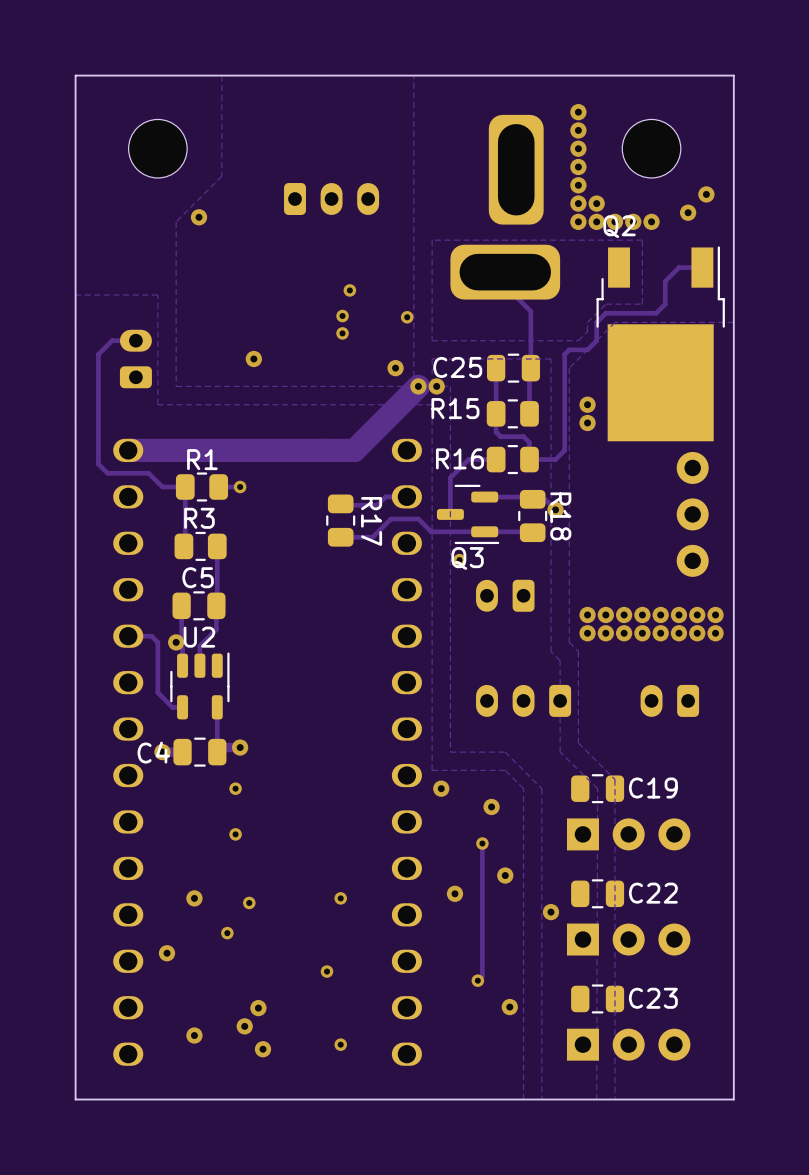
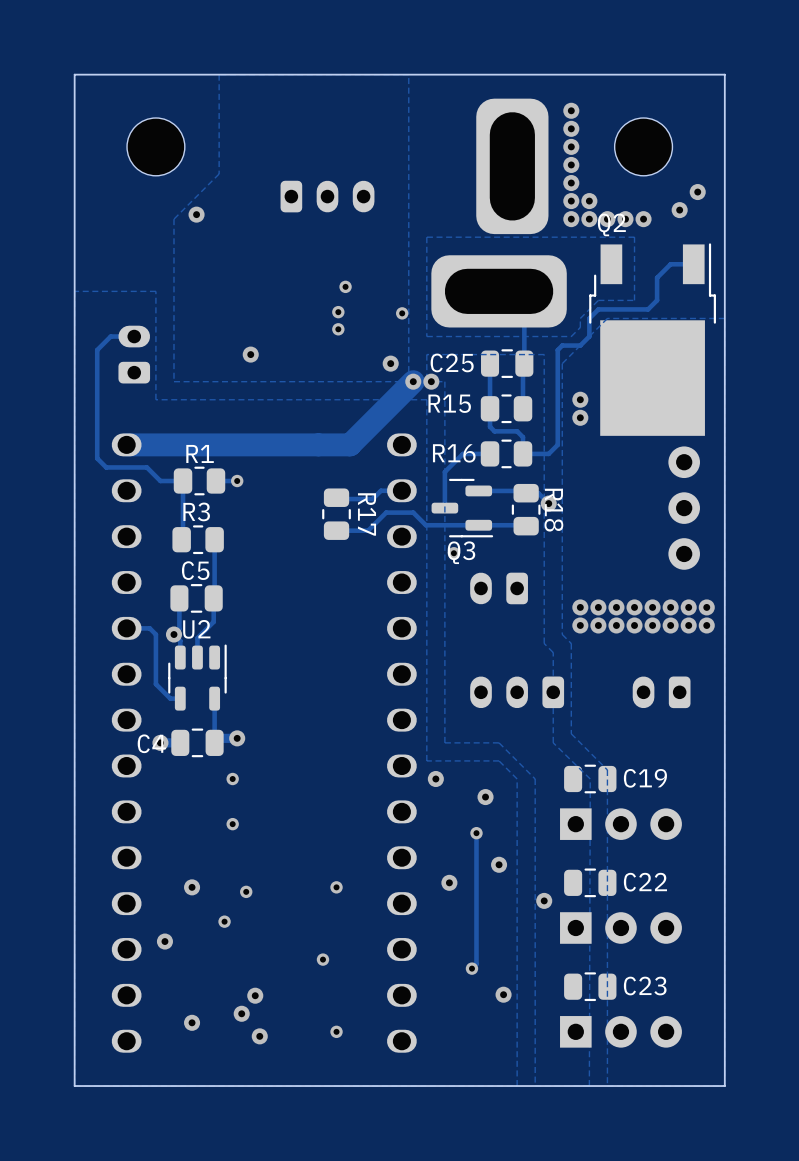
part footprint: [450, 114, 561, 300] -> [431, 98, 567, 328]

